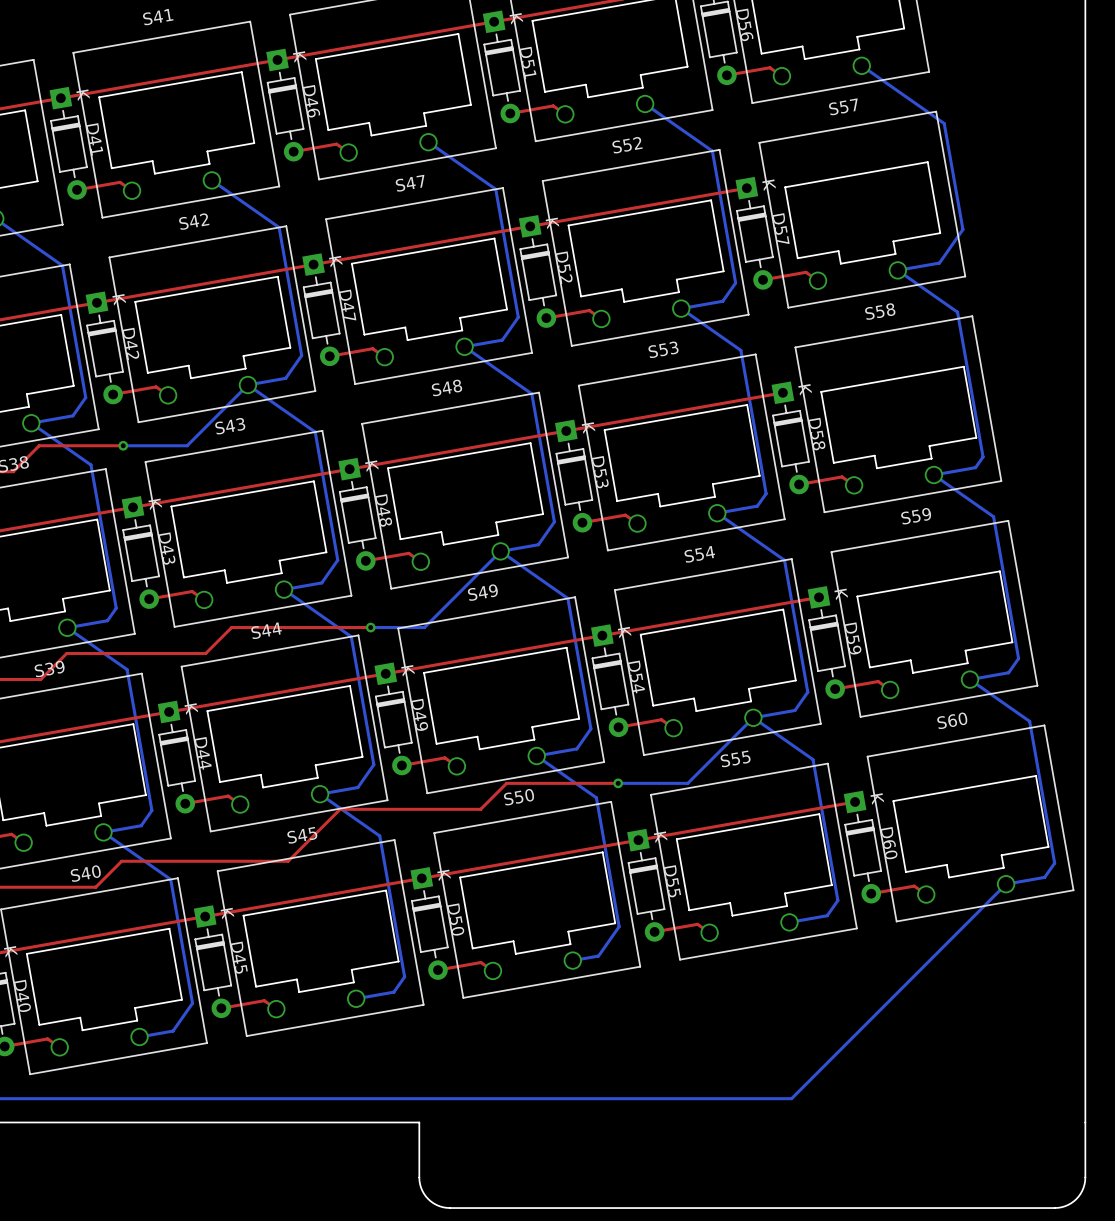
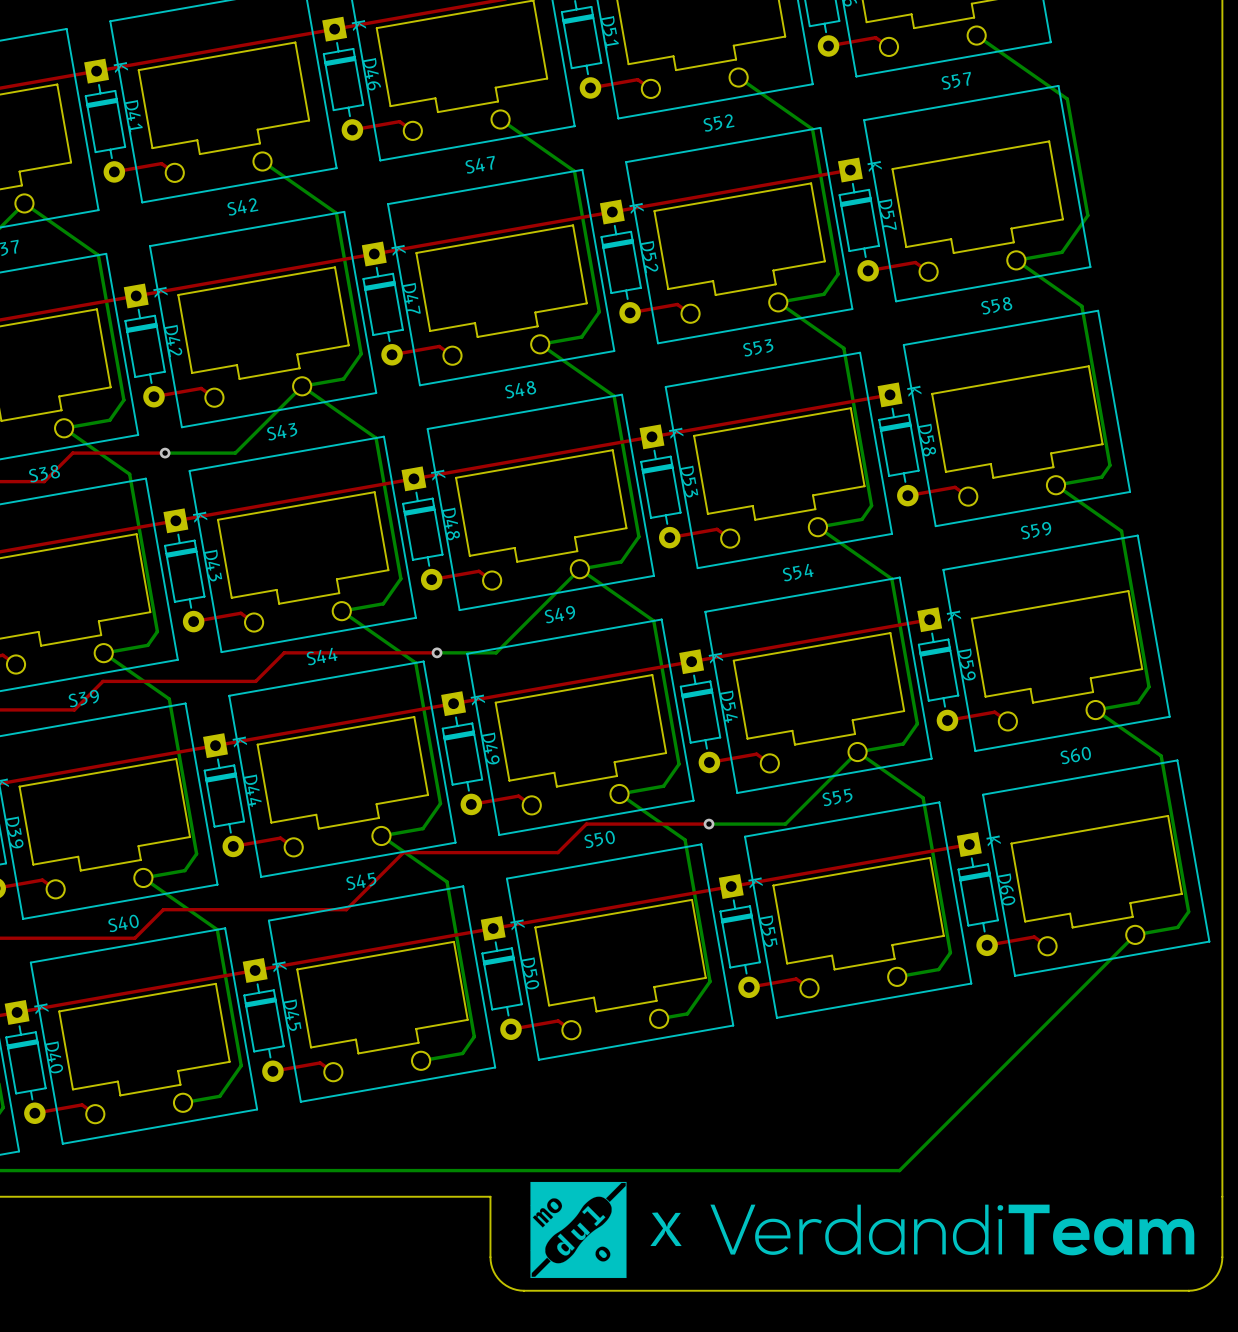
drawing: none -> [530, 1181, 627, 1279]
drawing: none -> [710, 1204, 1195, 1256]
text: none -> X (666, 1229)

